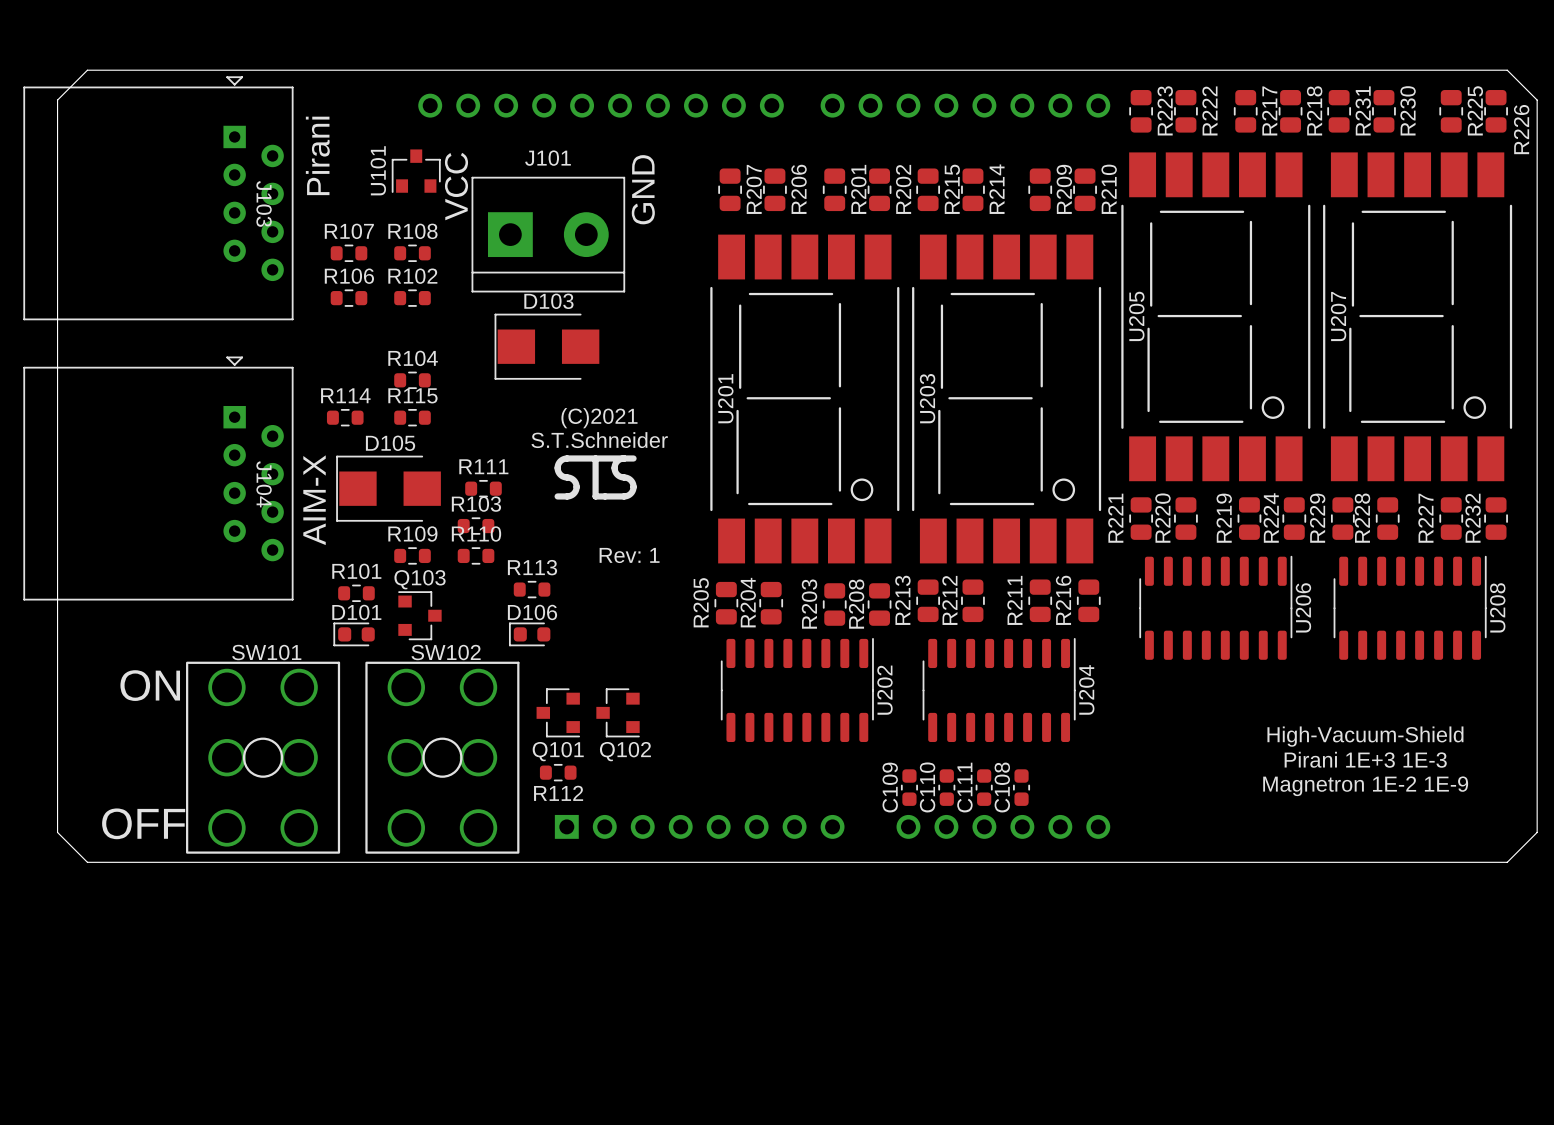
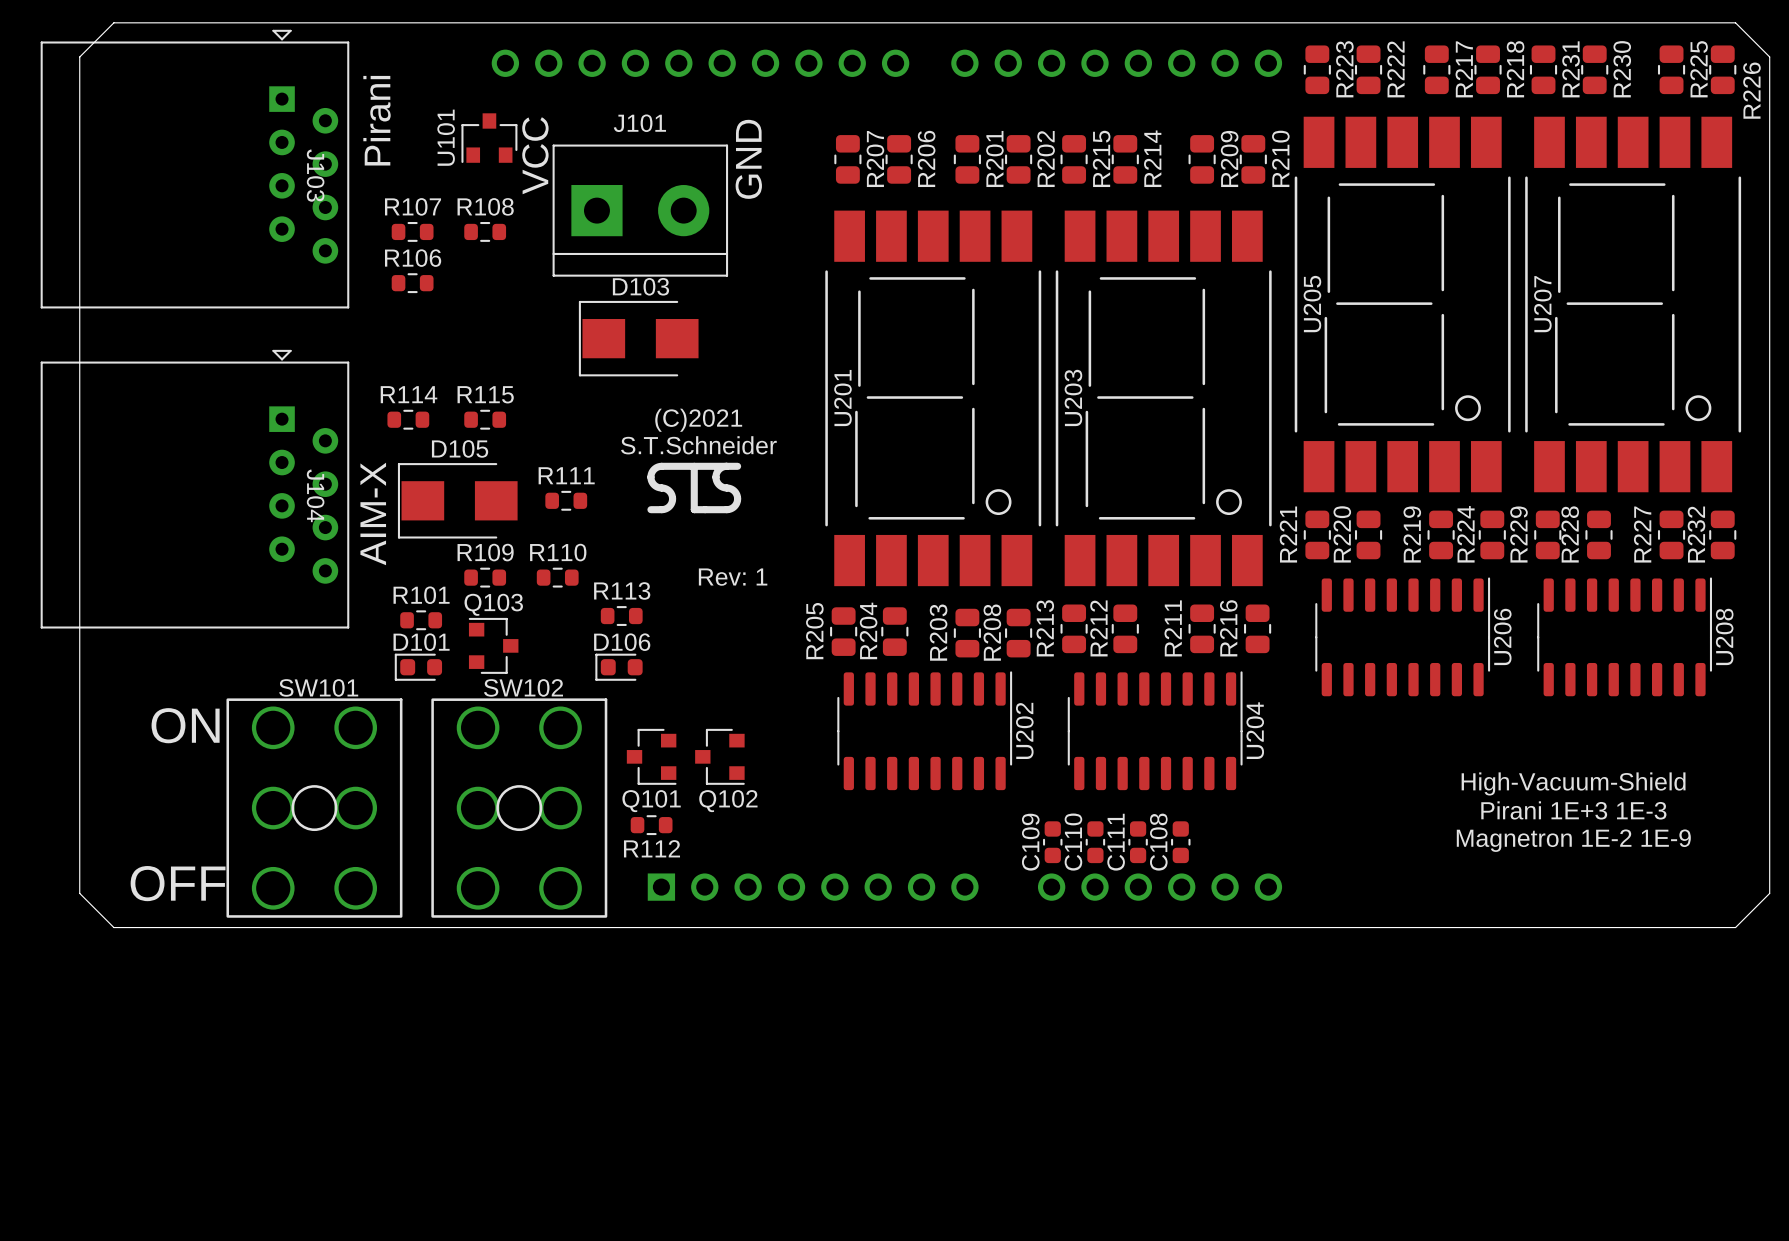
R102: (412, 298) -> none
R104: (412, 380) -> none
R103: (476, 526) -> none

